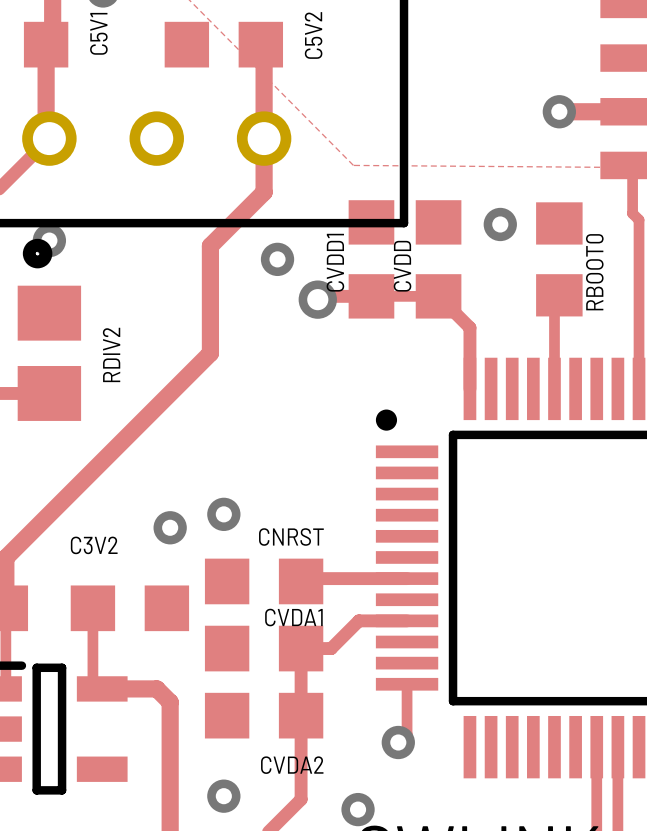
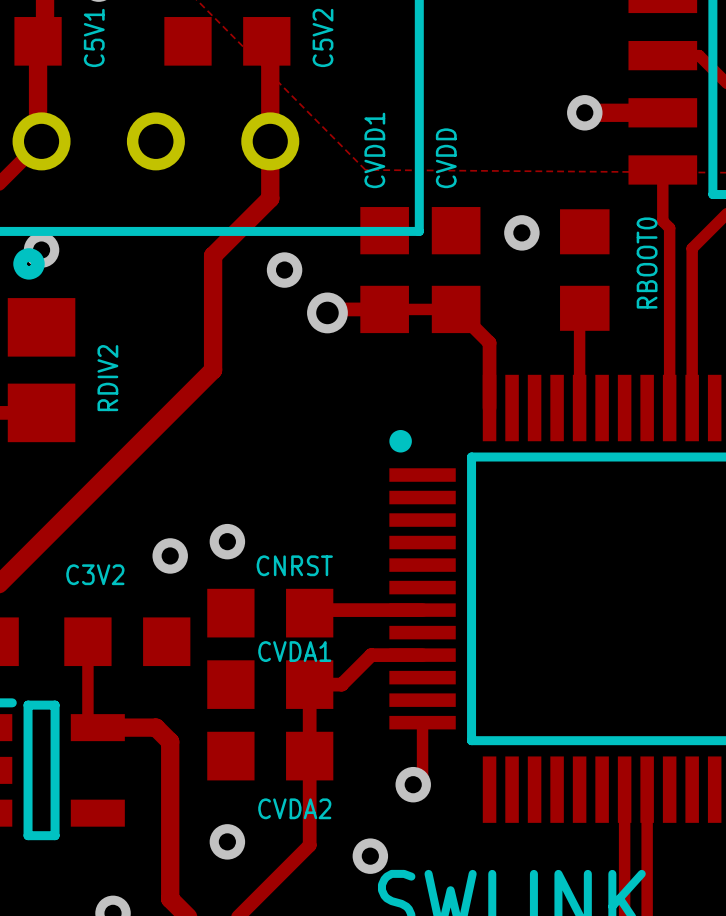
CVDD1 name position: CVDD1 (335, 262) -> CVDD1 (374, 150)
CVDD name position: CVDD (402, 266) -> CVDD (446, 158)
RBOOT0 name position: RBOOT0 (594, 272) -> RBOOT0 (647, 263)

